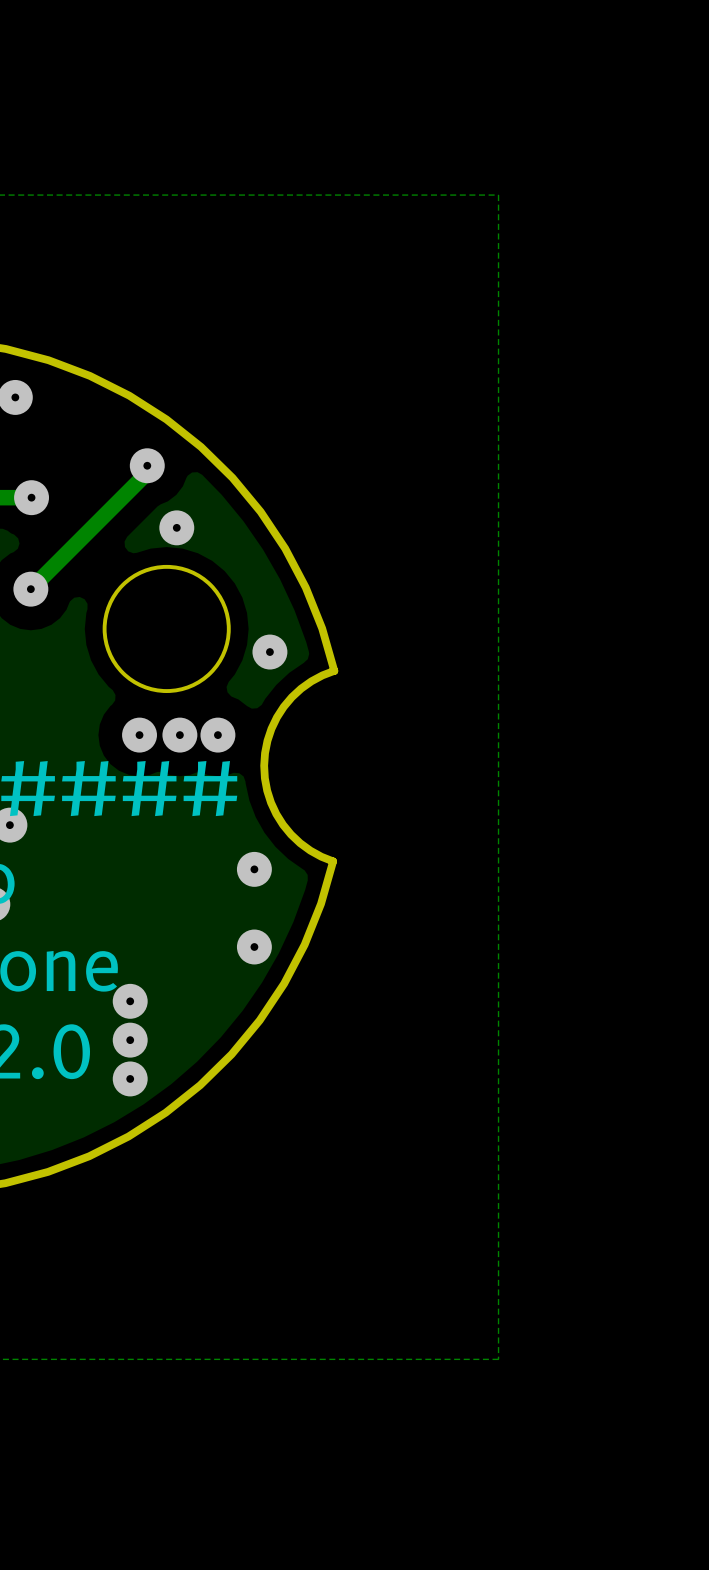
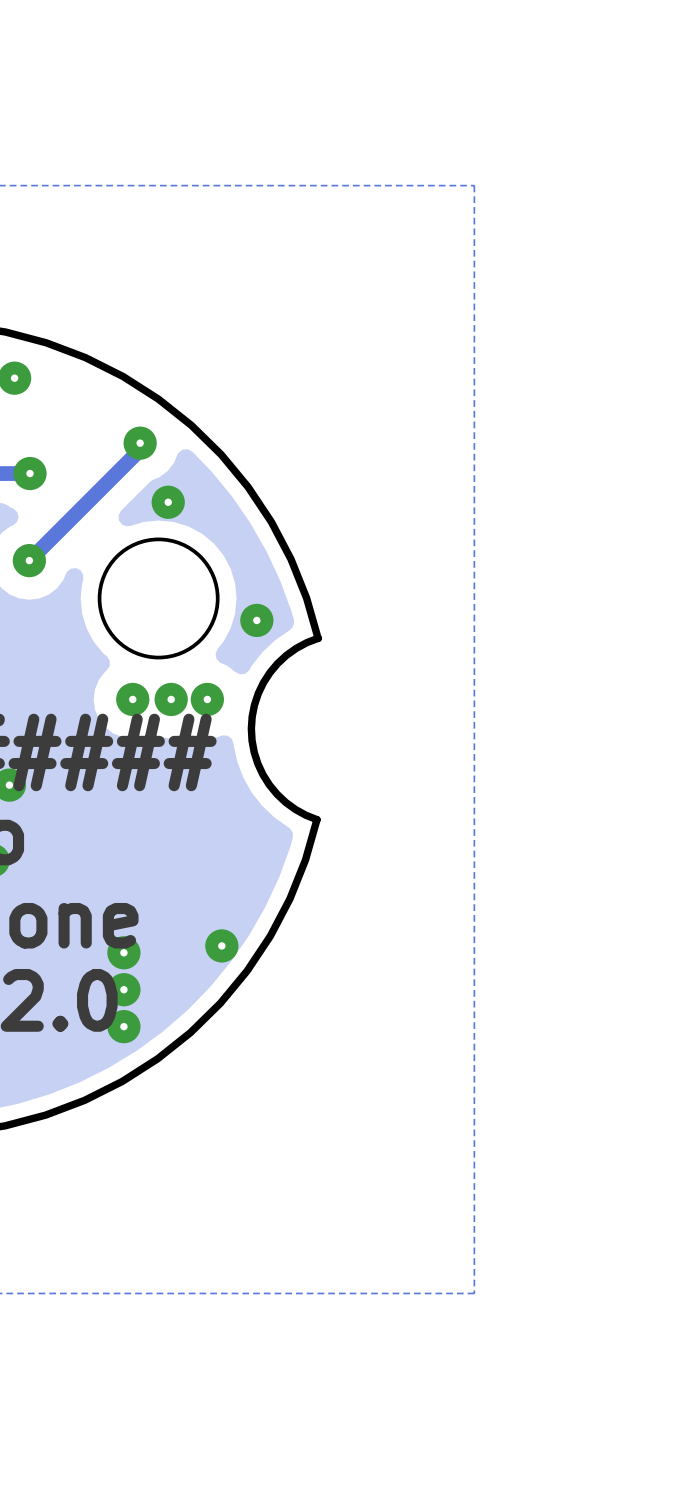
via: (254, 869) -> none
via position: (254, 946) -> (221, 945)

